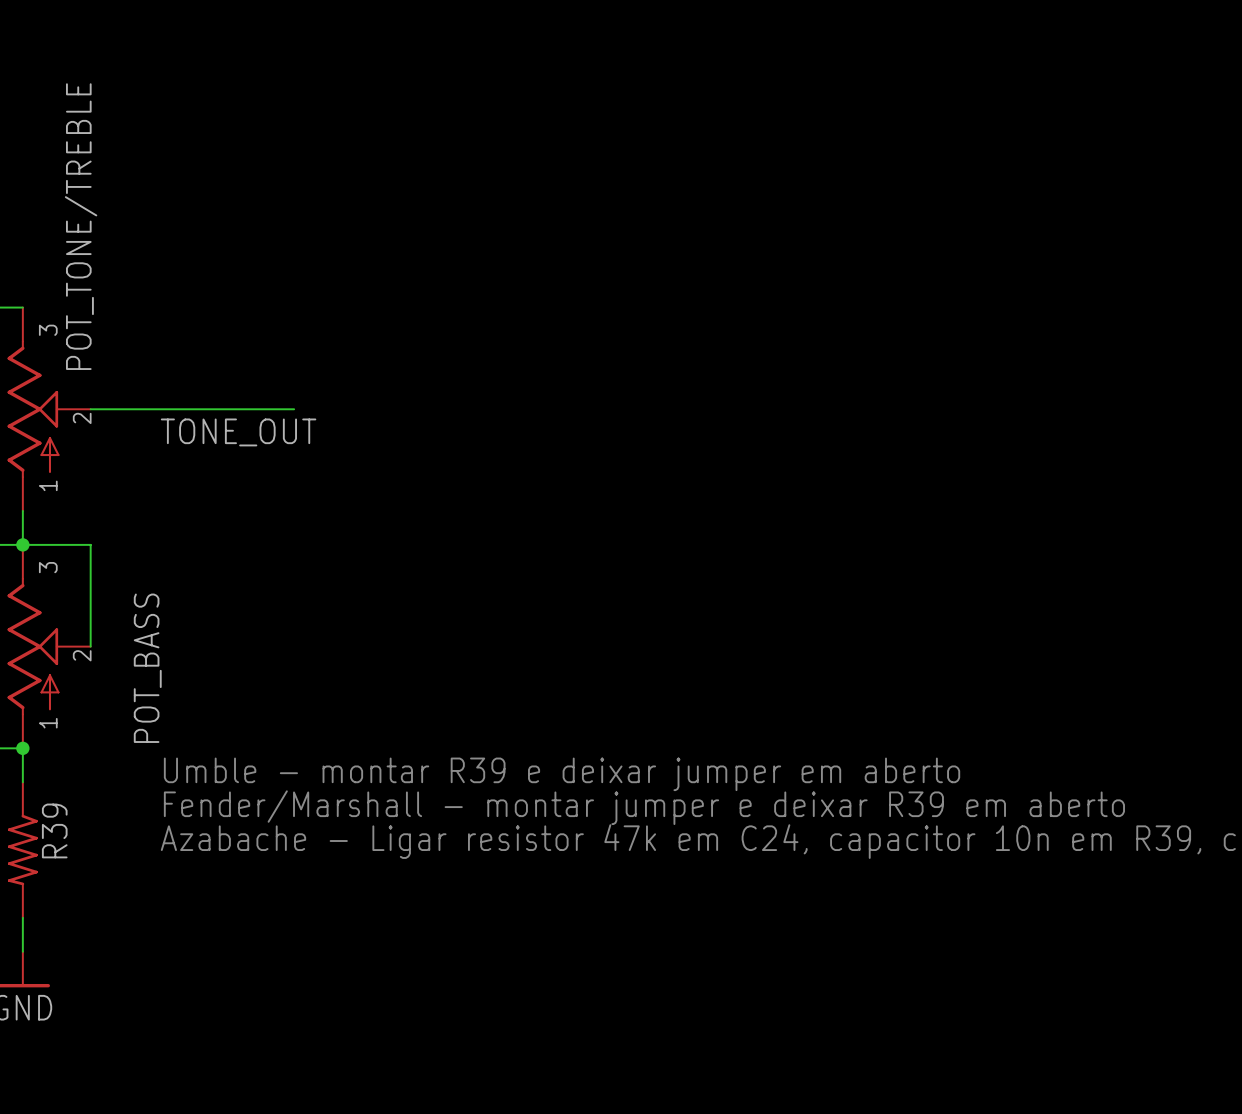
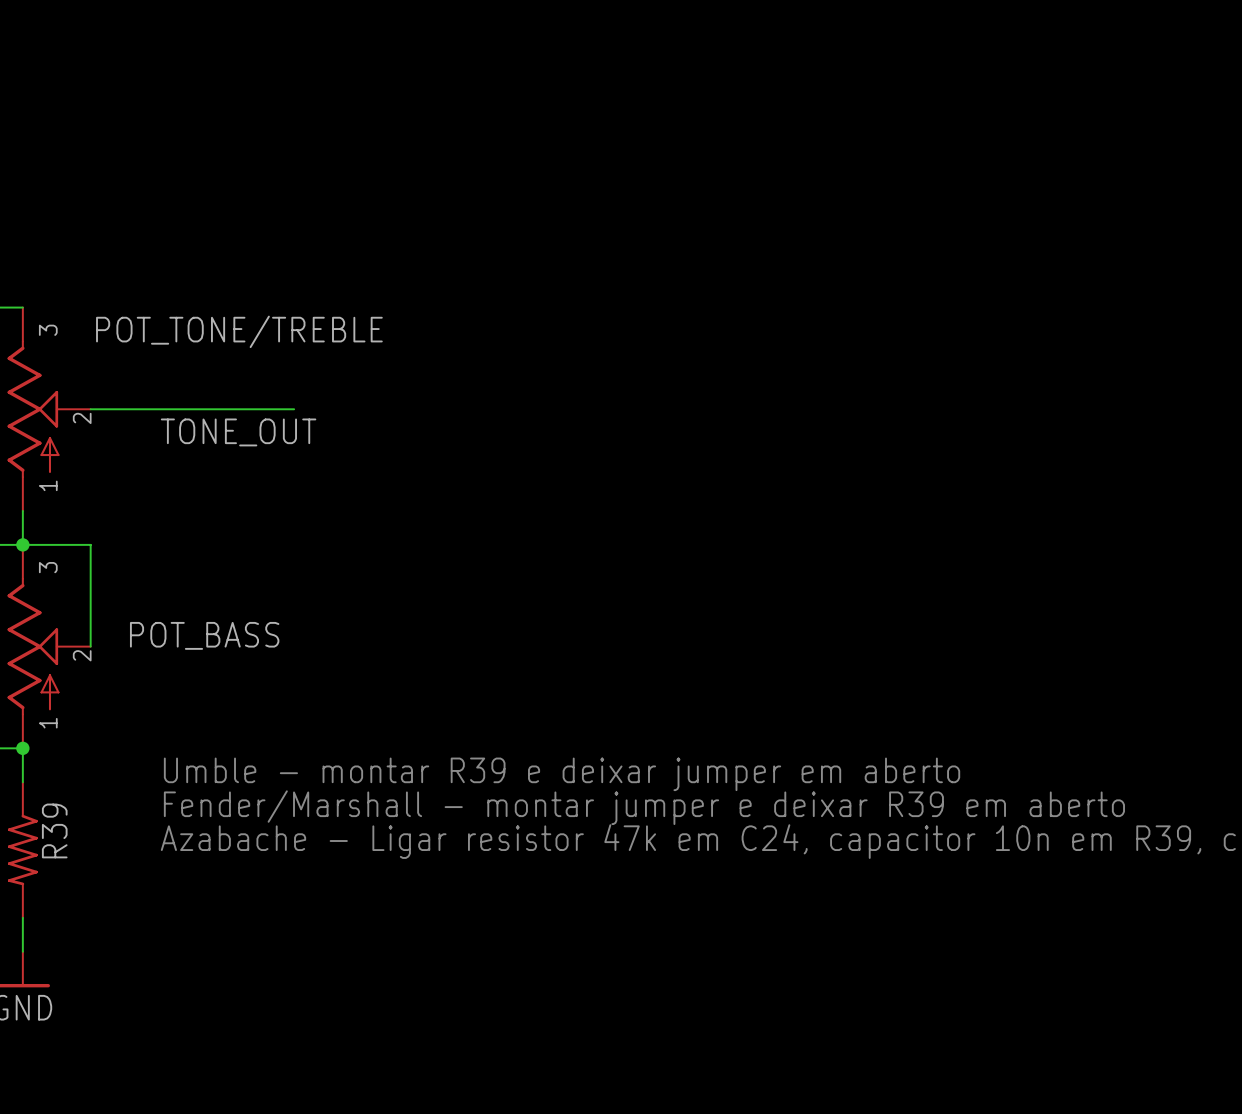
POT_TONE/TREBLE name rotation: 0° (81, 226) -> 90° clockwise (239, 331)
POT_BASS name rotation: 0° (147, 668) -> 90° clockwise (204, 635)

